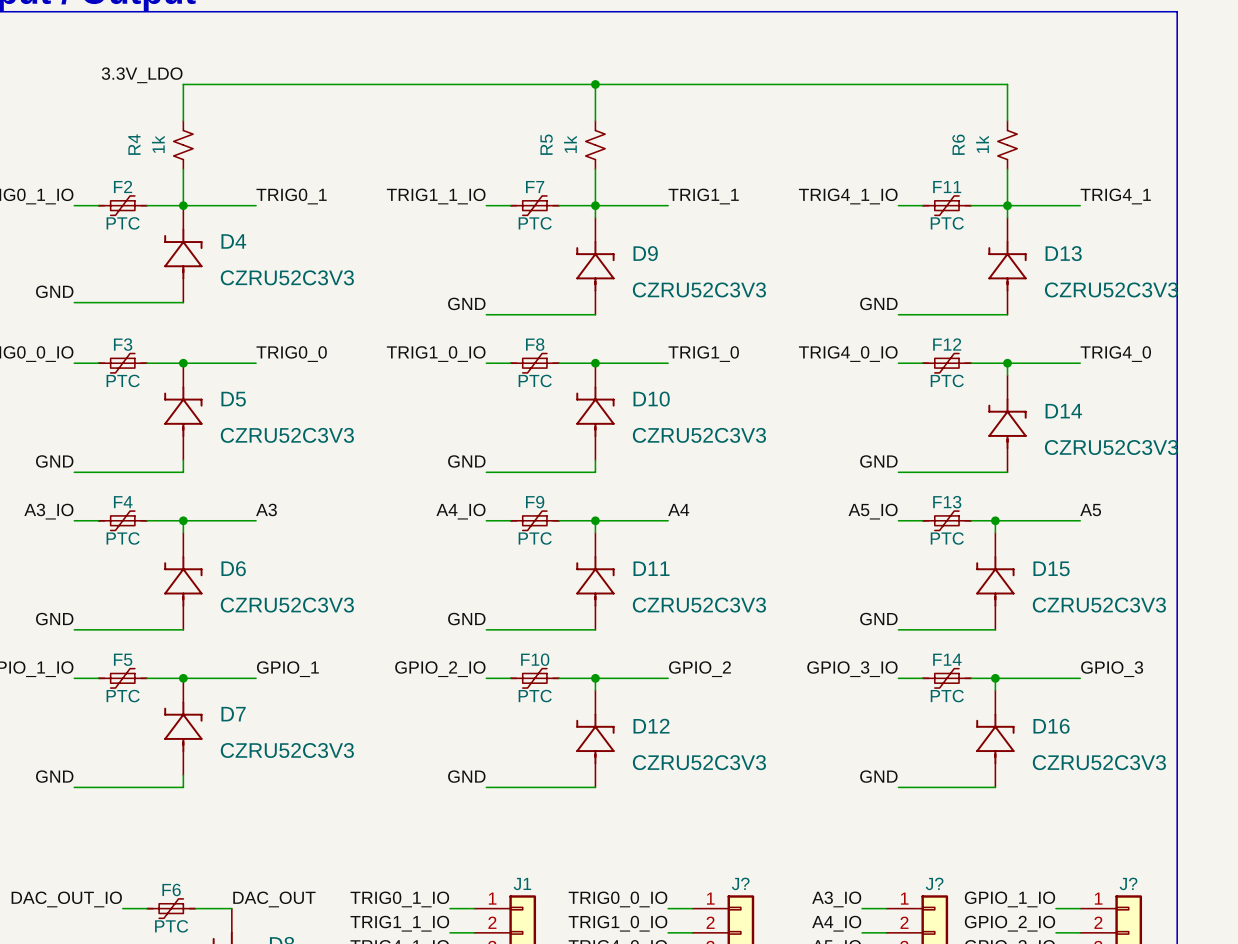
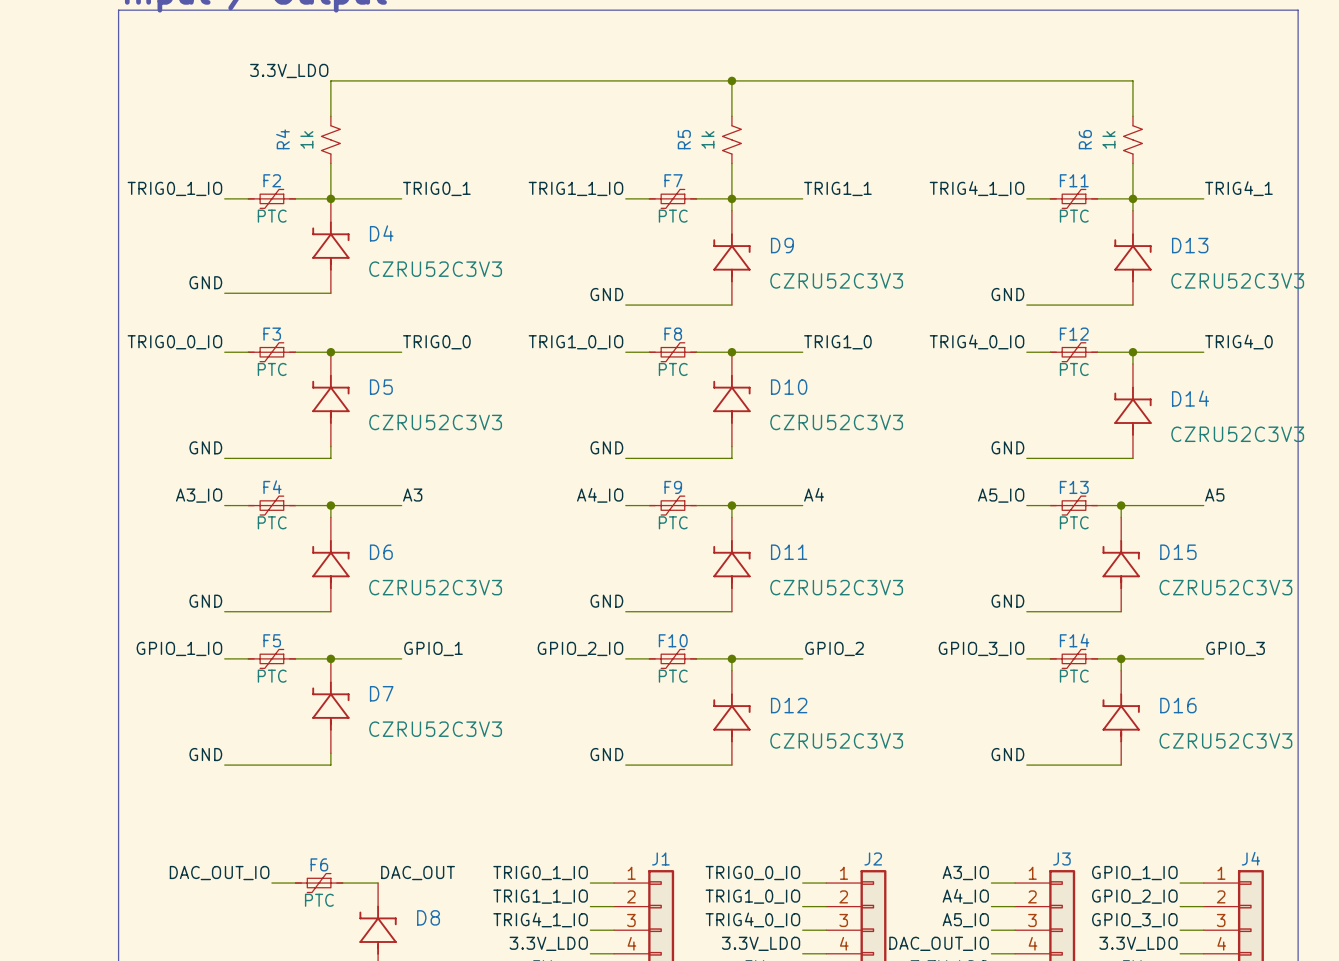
J? name: J? (740, 883) -> J2 (873, 858)
J? name: J? (934, 883) -> J3 (1061, 858)
J? name: J? (1128, 883) -> J4 (1250, 858)

